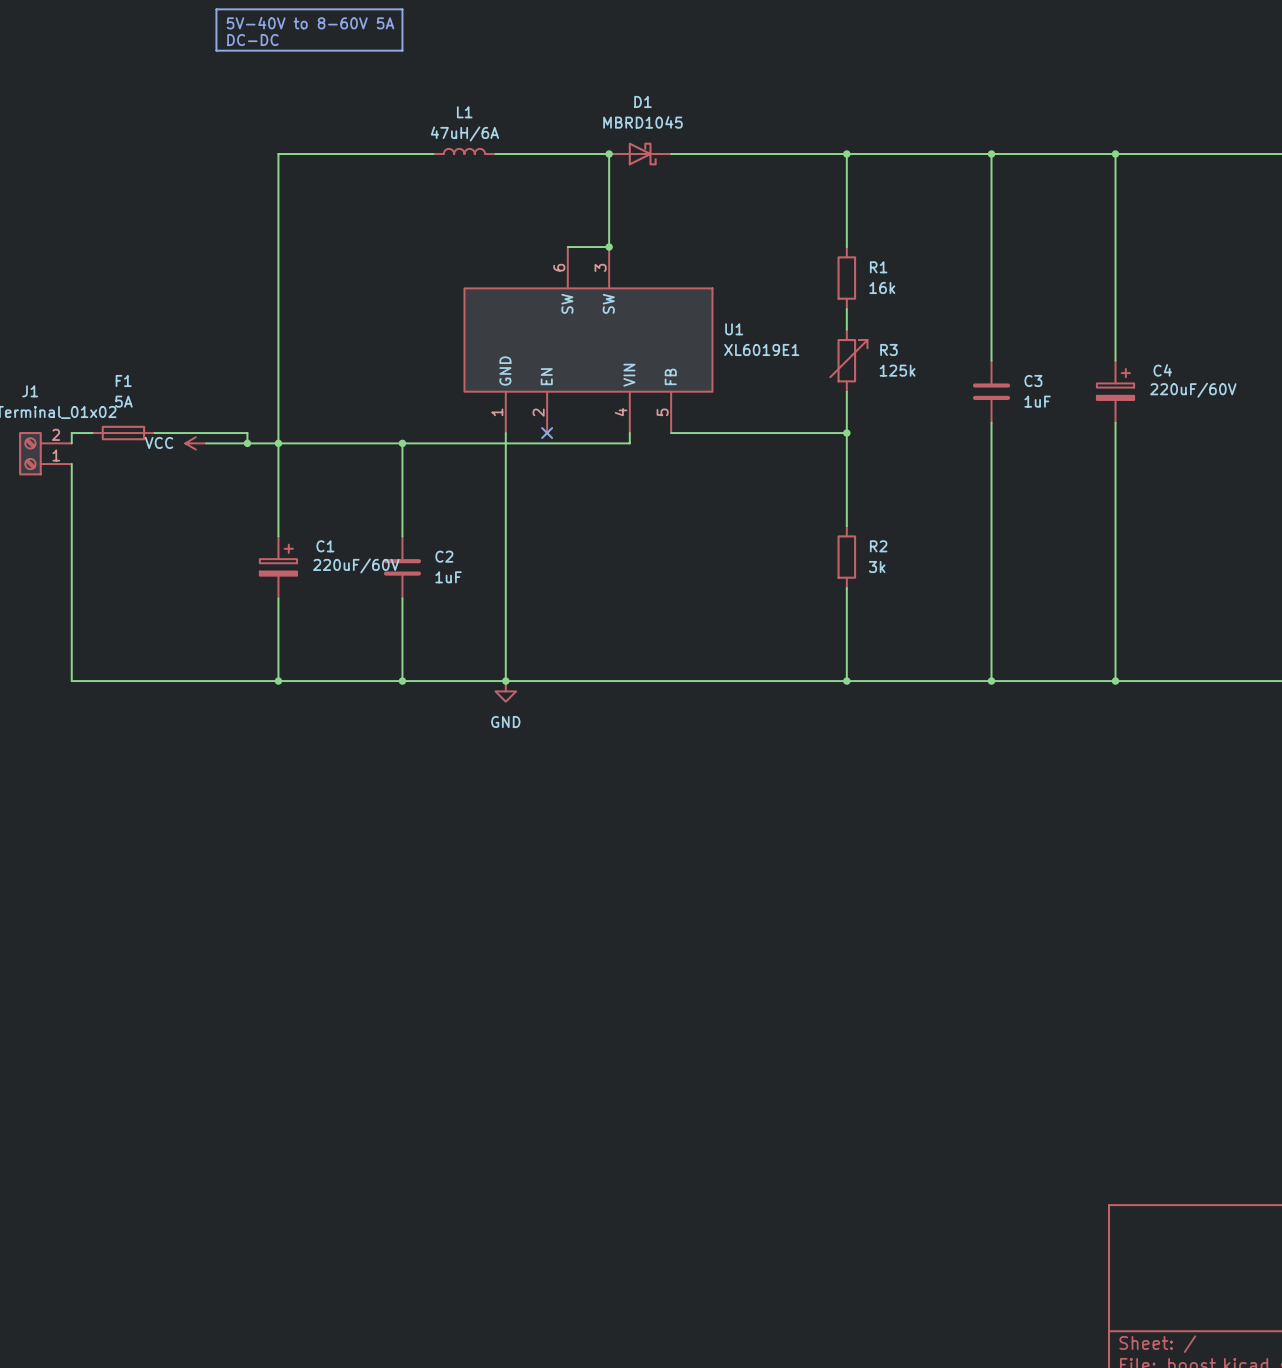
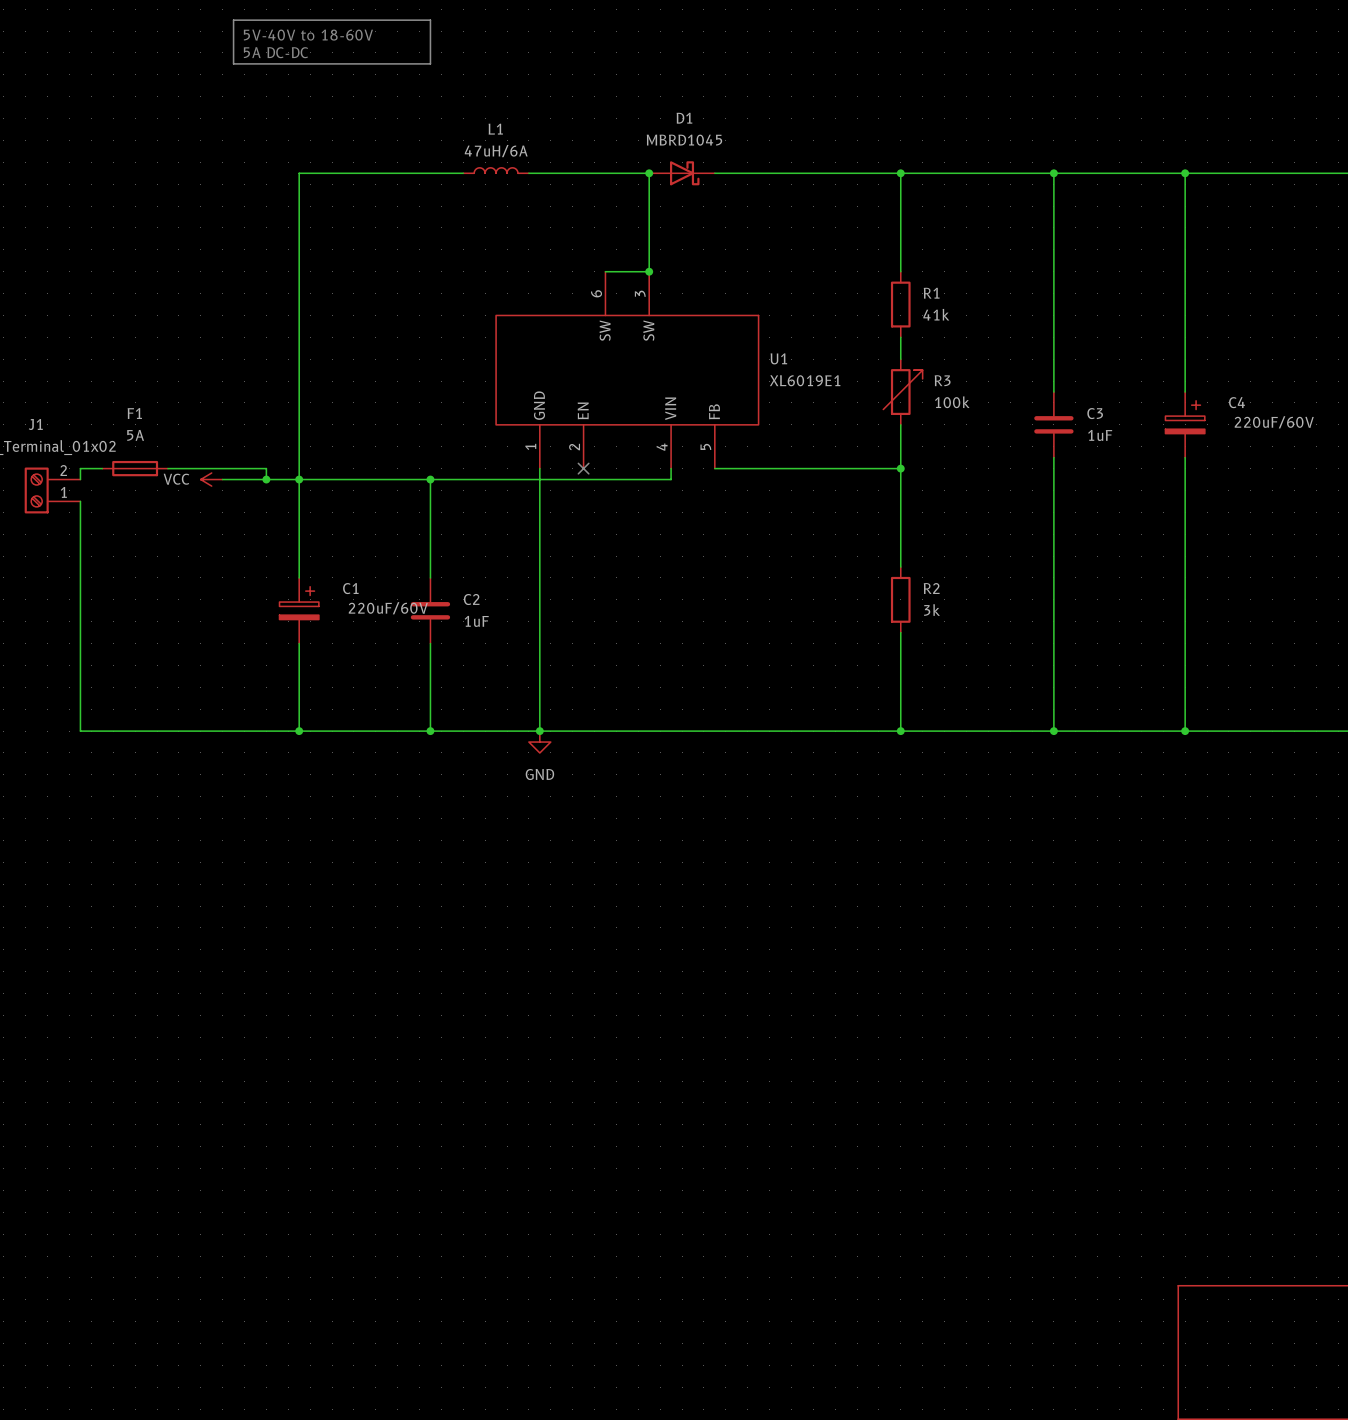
text: 5V-40V to 8-60V 5A (310, 23) -> 5V-40V to 18-60V (308, 35)
text: DC-DC (252, 40) -> 5A DC-DC (275, 52)
R1 value: 16k (882, 287) -> 41k (936, 314)
R3 value: 125k (897, 370) -> 100k (952, 402)

